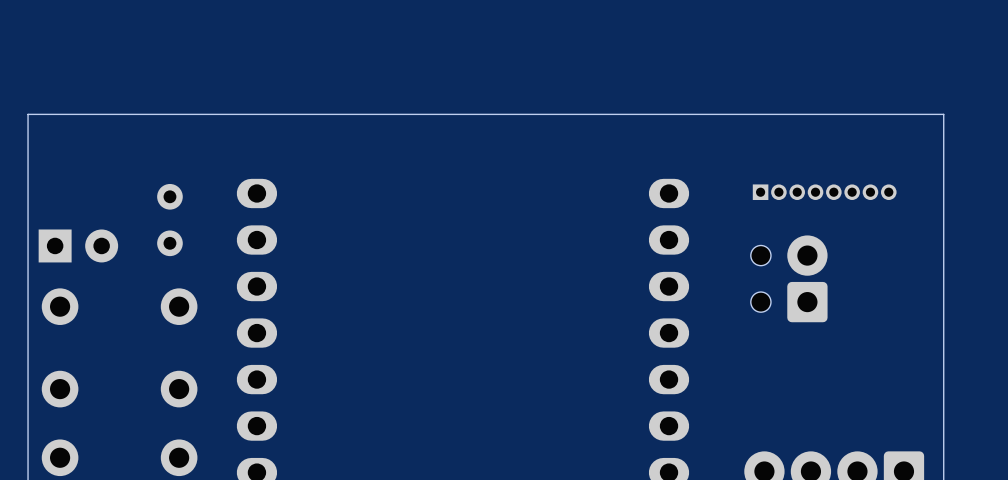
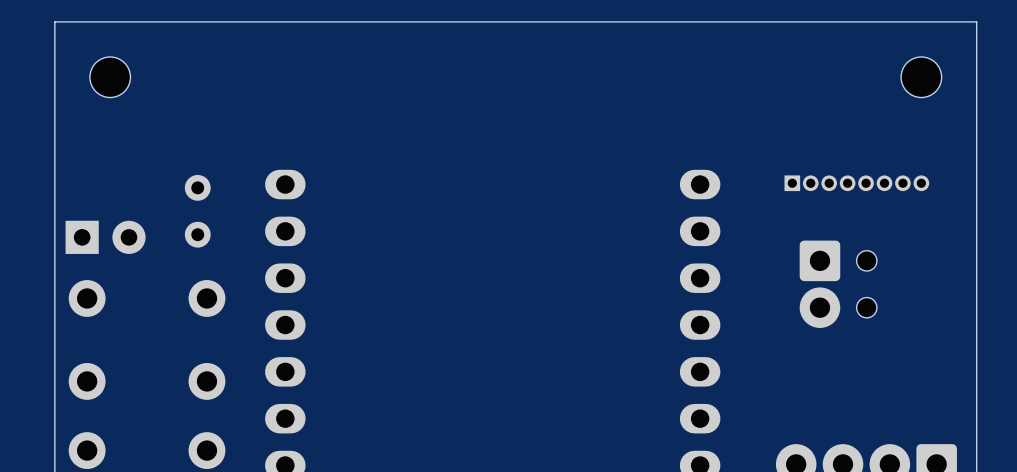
part: none -> (110, 77)
part: none -> (921, 77)
board edge: (943, 114) (28, 114) -> (976, 104) (976, 21) (54, 21) (54, 104)
part rotation: 0° (789, 278) -> 180° (838, 284)

